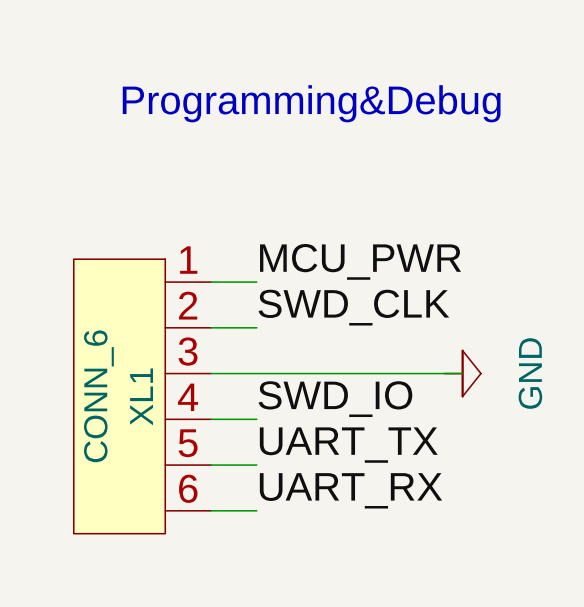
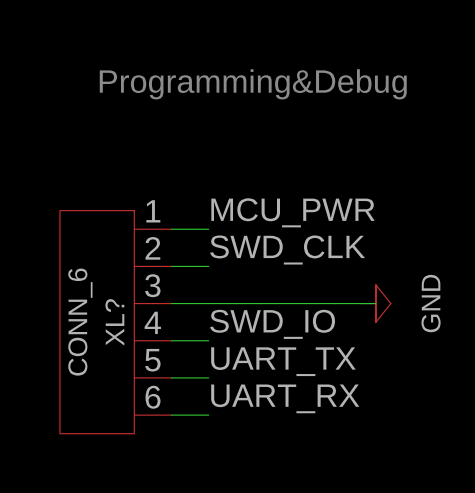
XL1 name: XL1 (141, 396) -> XL? (114, 322)

